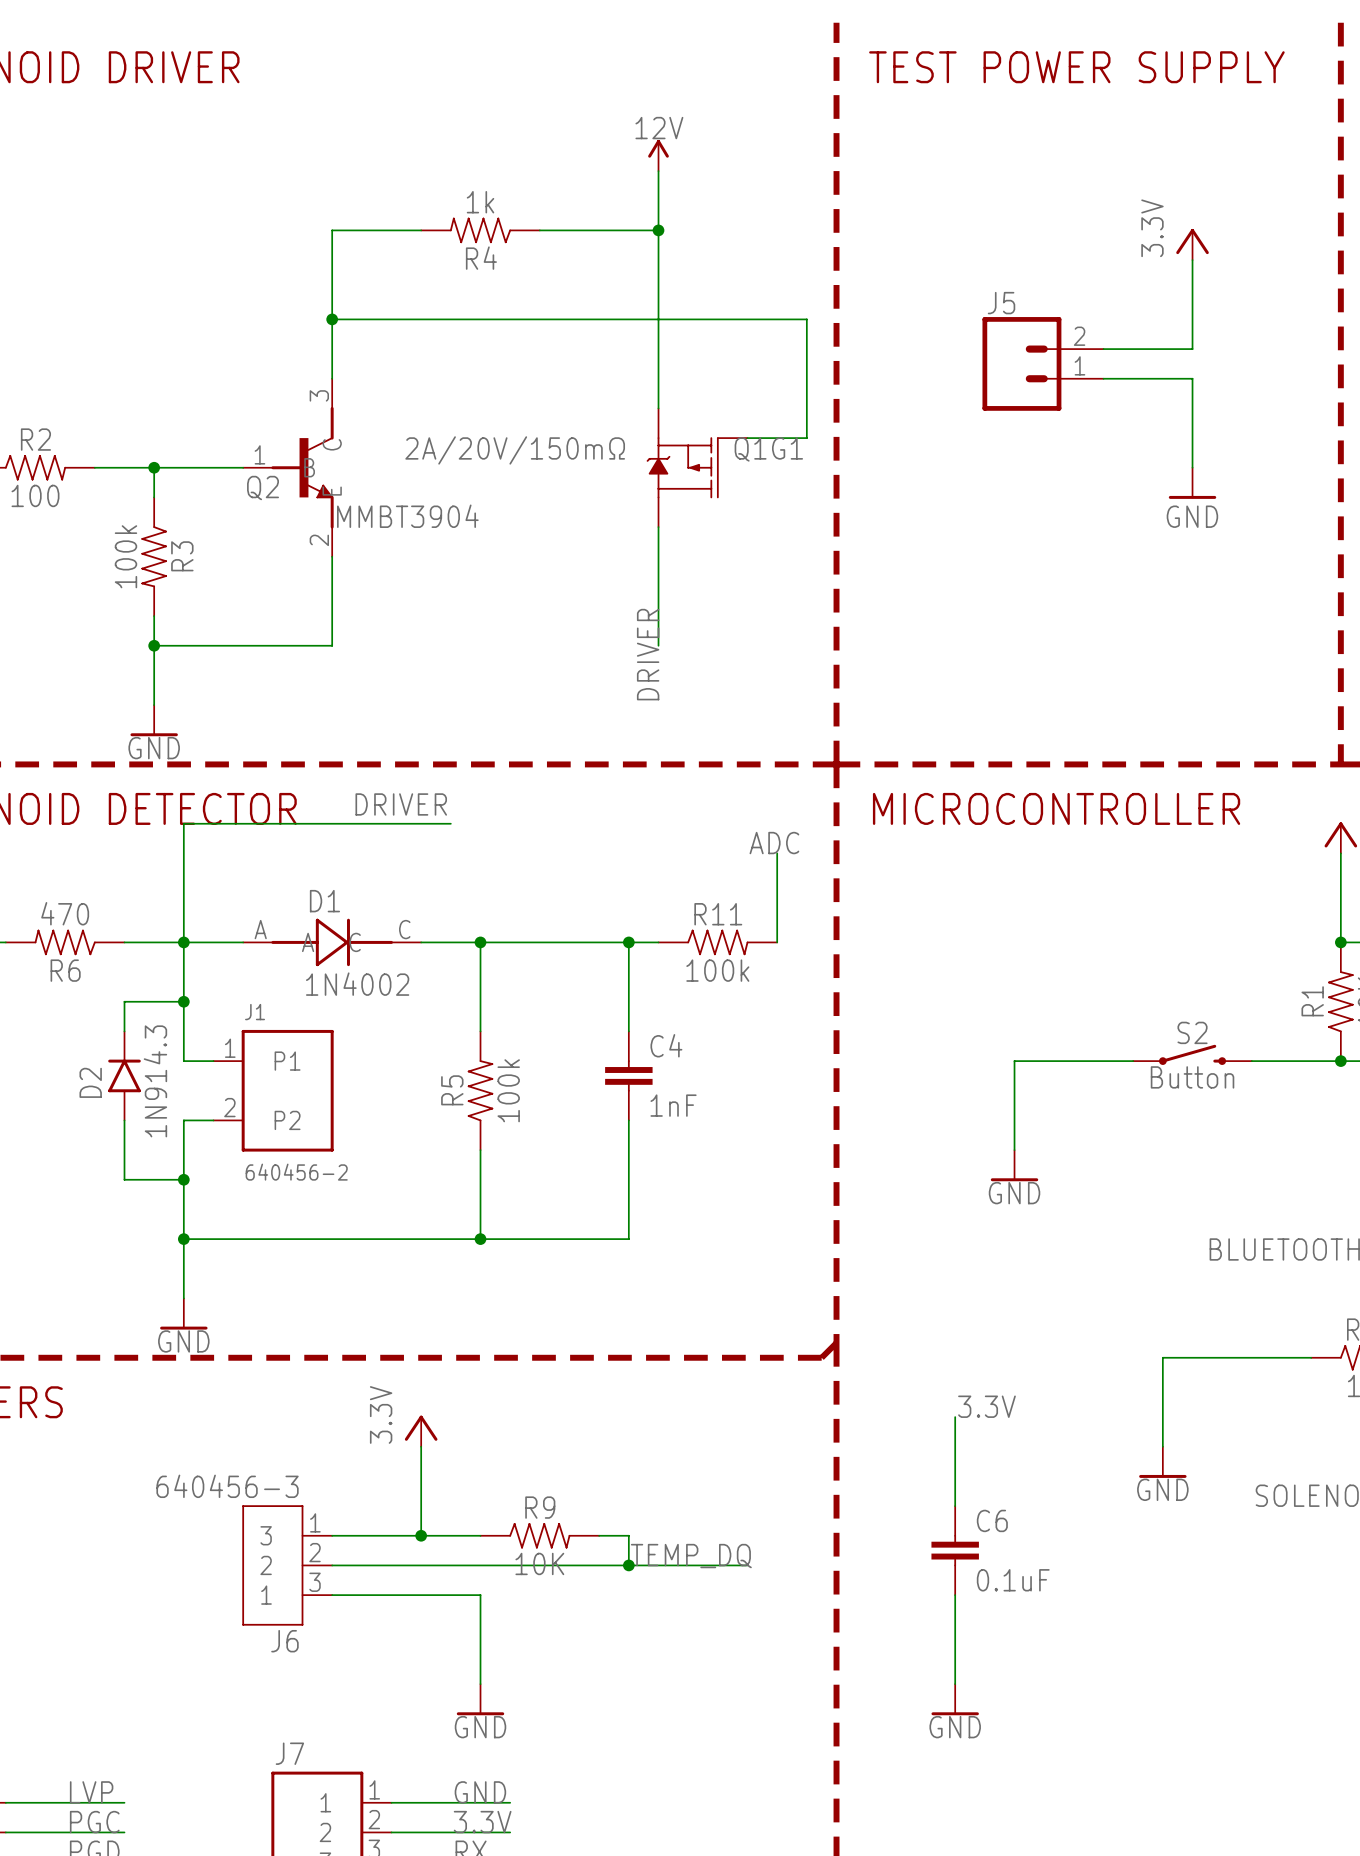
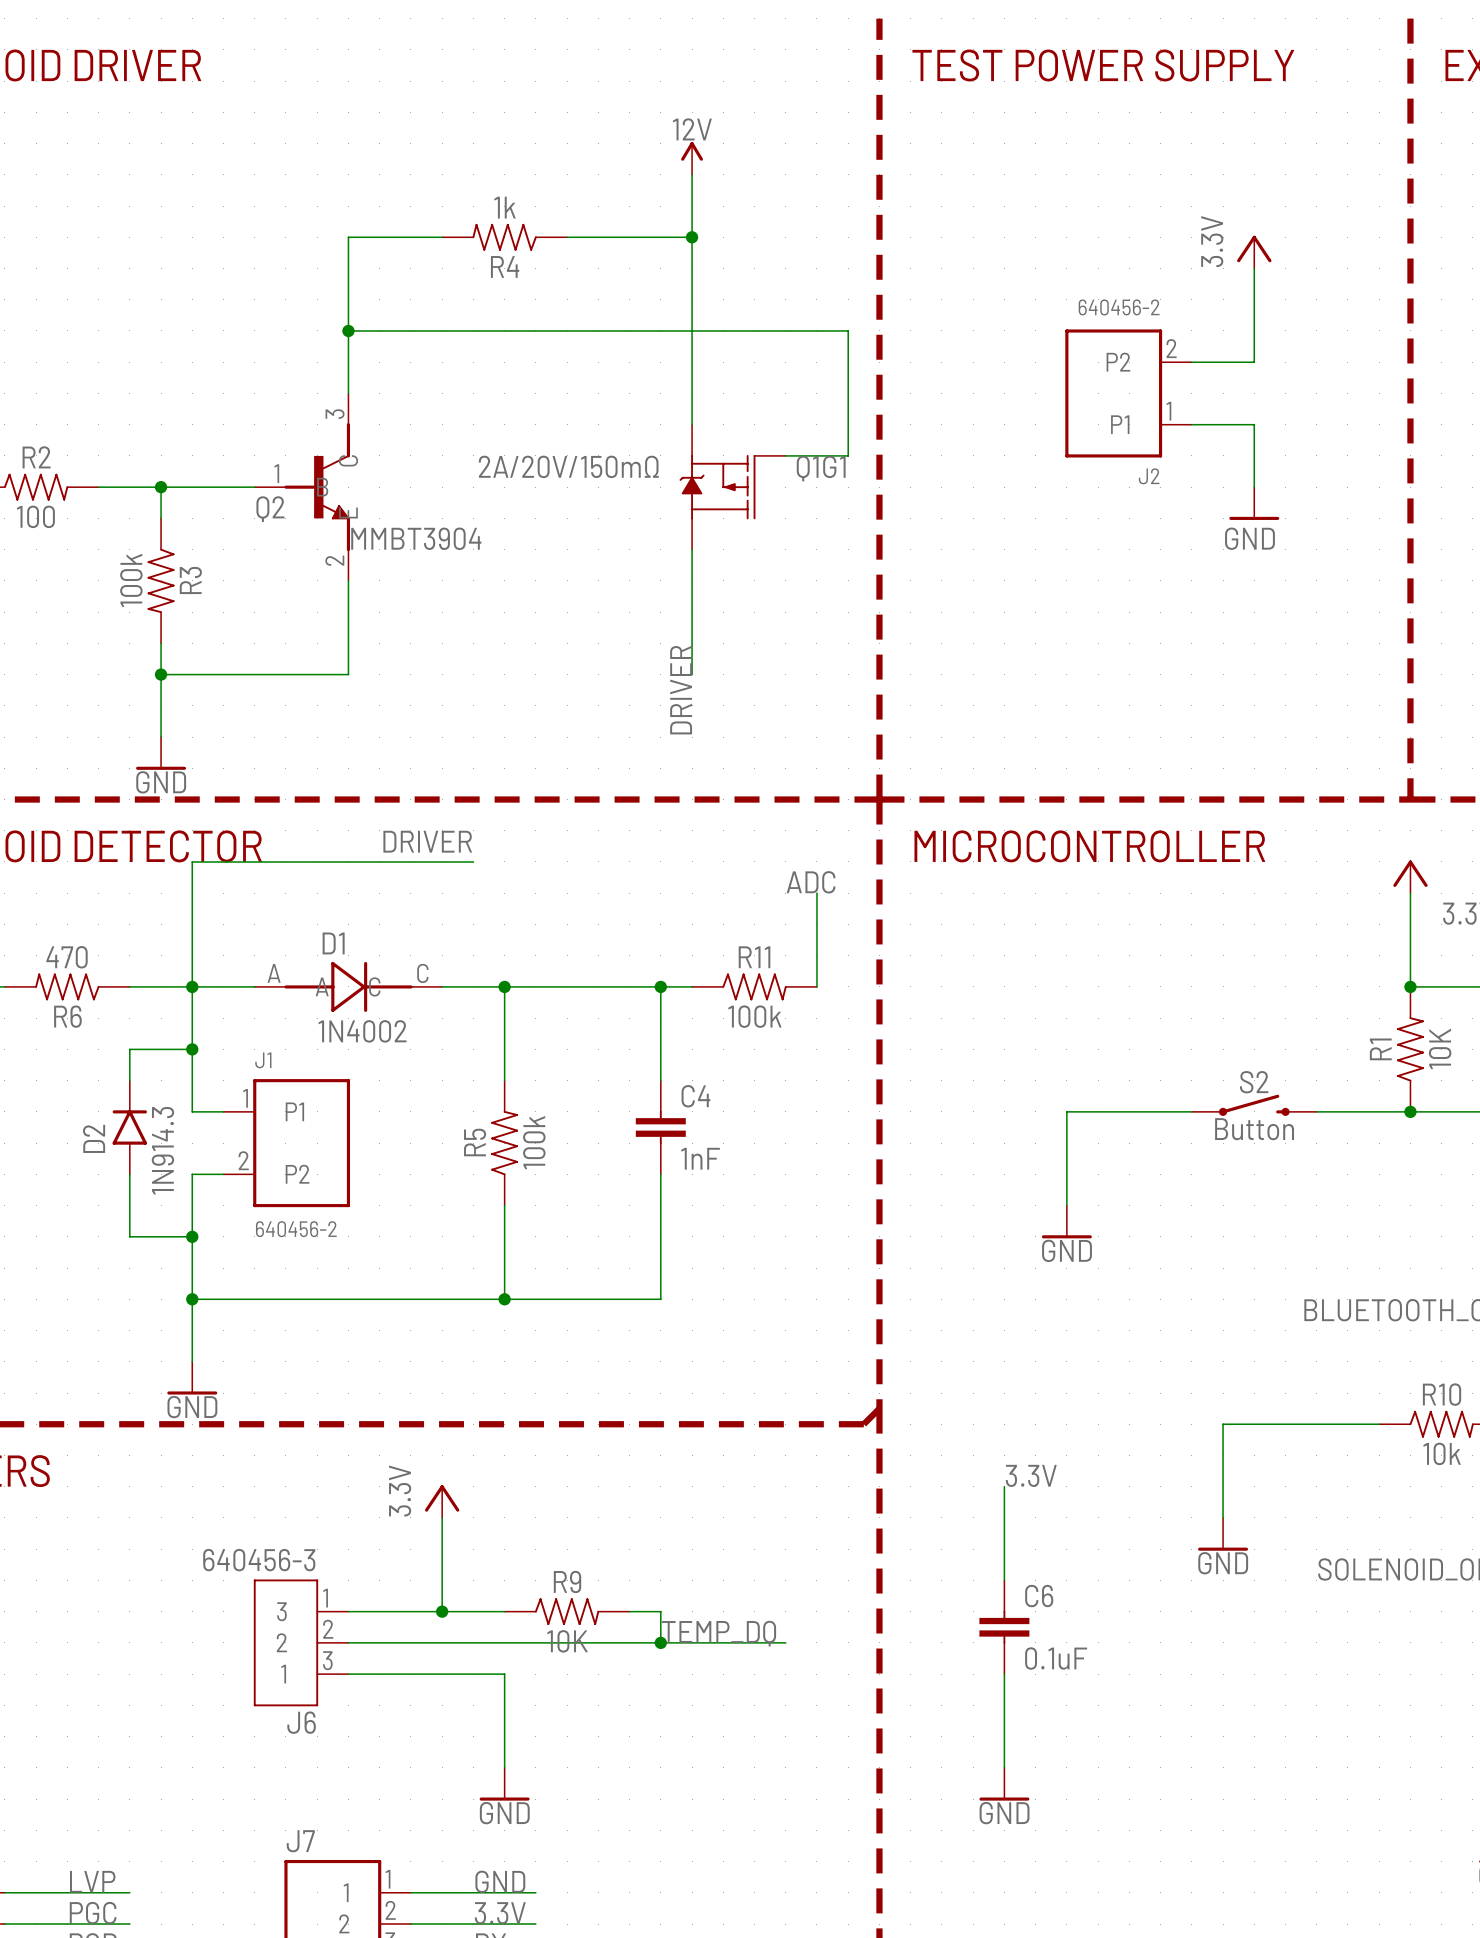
J5: (1043, 363) -> none
J2: none -> 640456-2 (1128, 393)
wire: (1103, 378) (1192, 378) (1192, 408) -> (1191, 424) (1254, 424)

